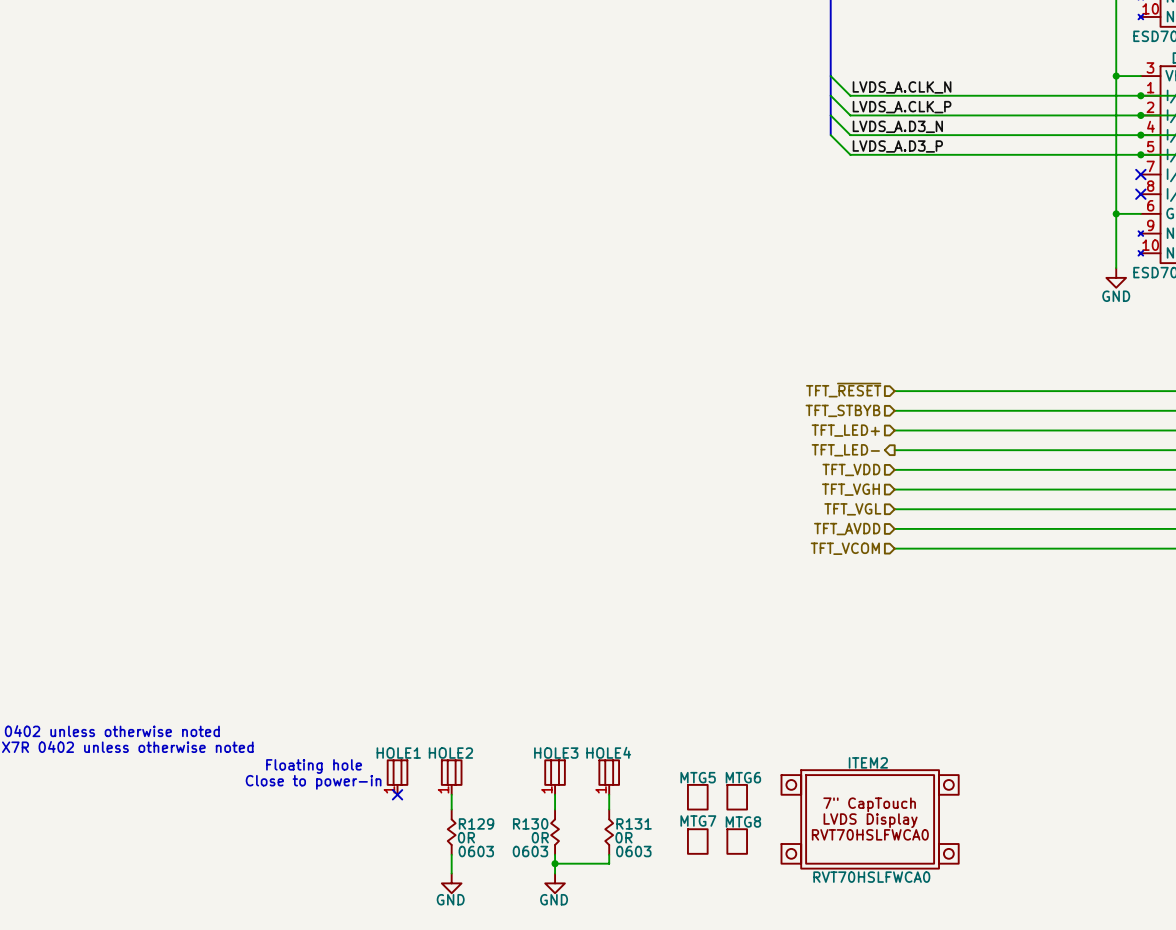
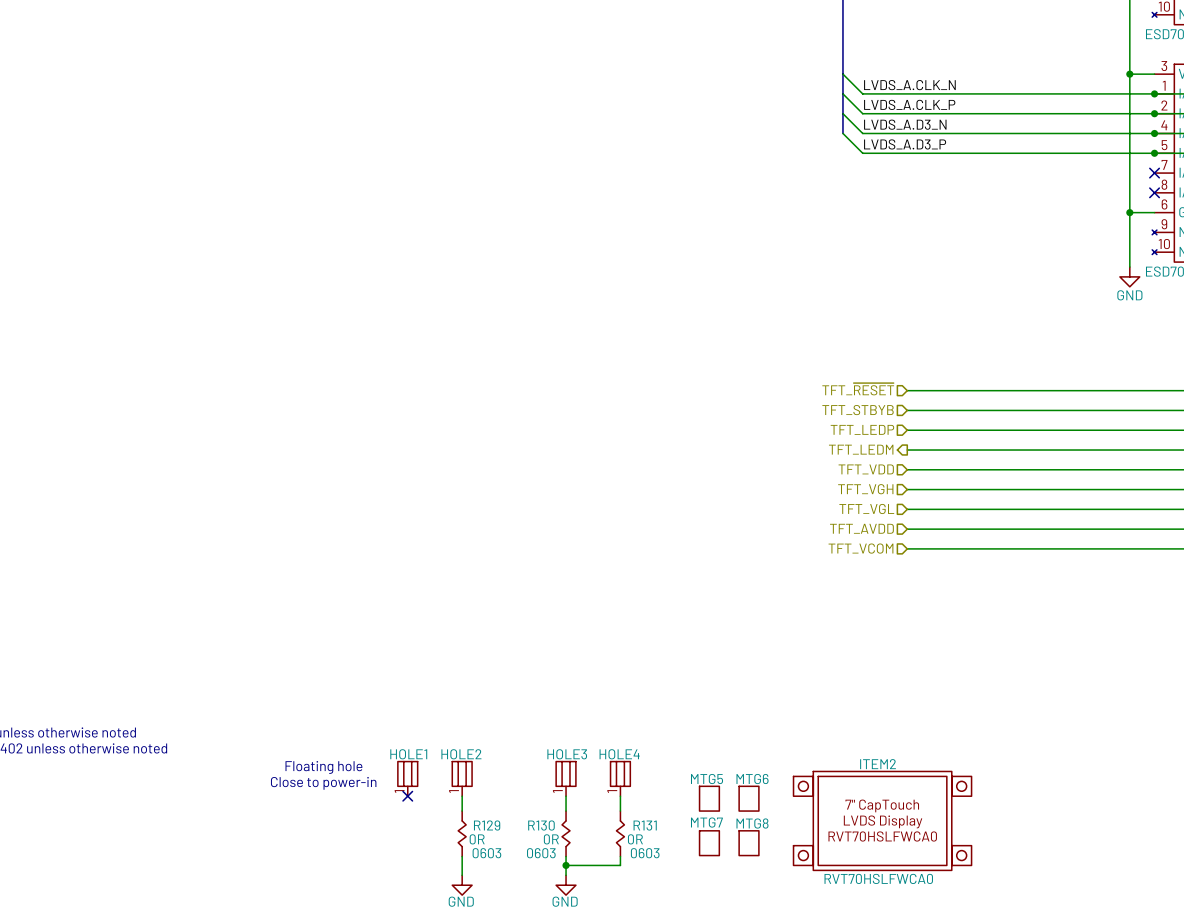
hierarchical label: TFT_LED+ (845, 430) -> TFT_LEDP (862, 429)
hierarchical label: TFT_LED- (845, 450) -> TFT_LEDM (861, 449)

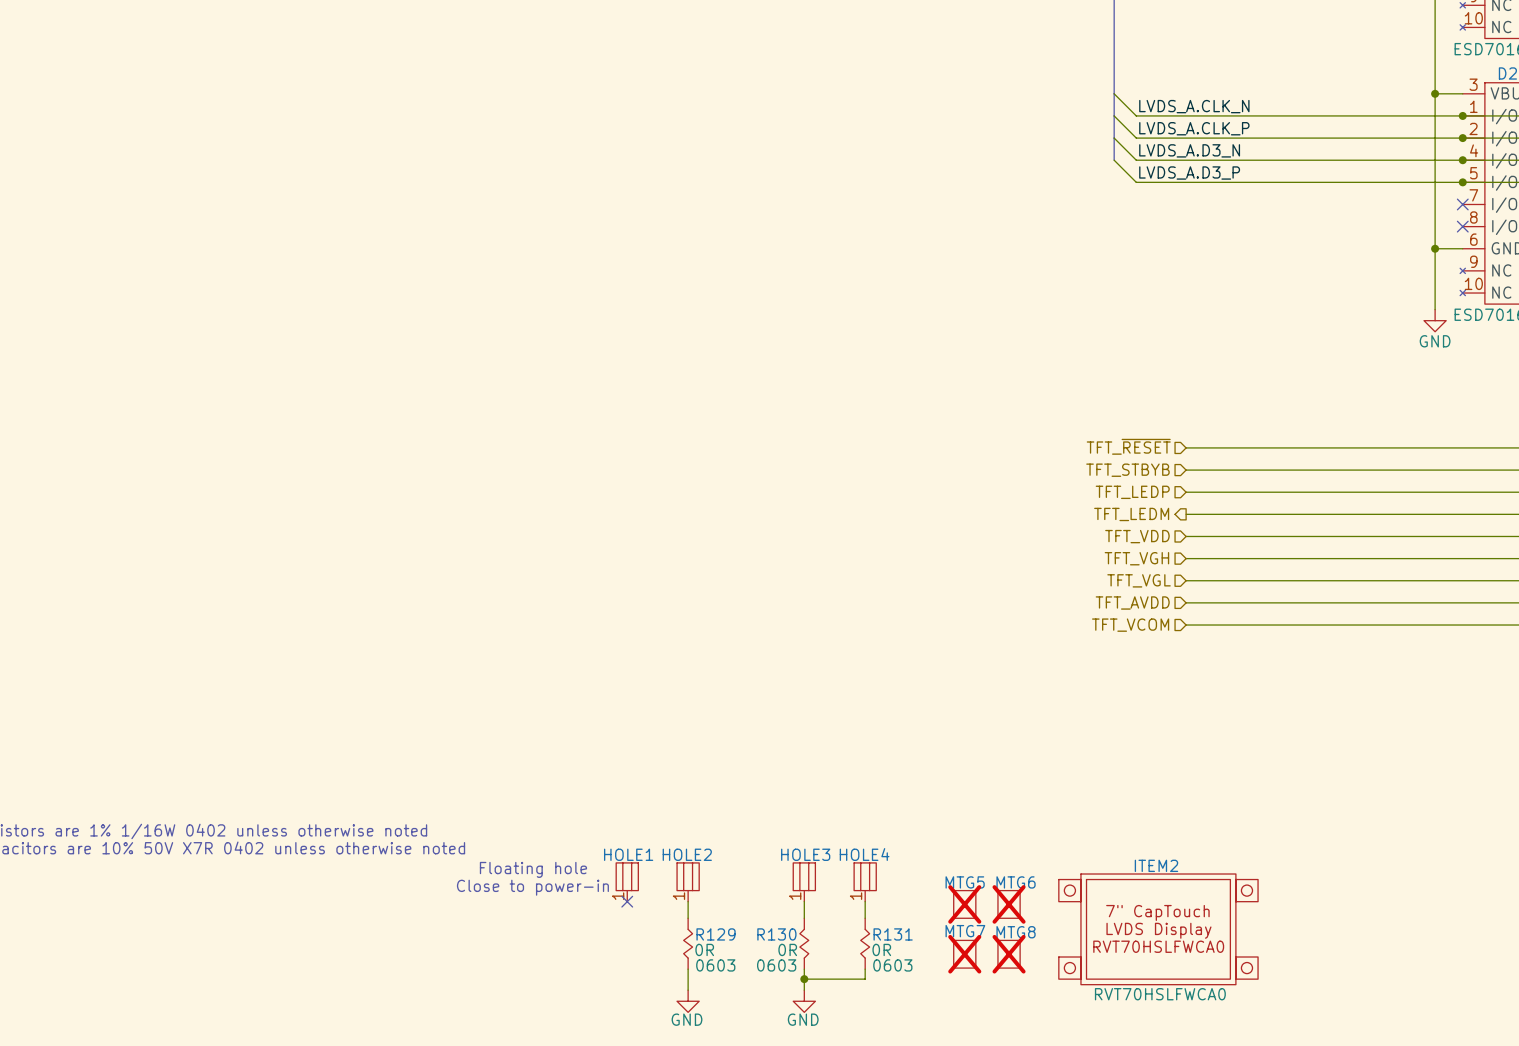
MTG5 do-not-place cross: none -> (964, 904)
MTG6 do-not-place cross: none -> (1009, 904)
MTG7 do-not-place cross: none -> (964, 954)
MTG8 do-not-place cross: none -> (1009, 954)

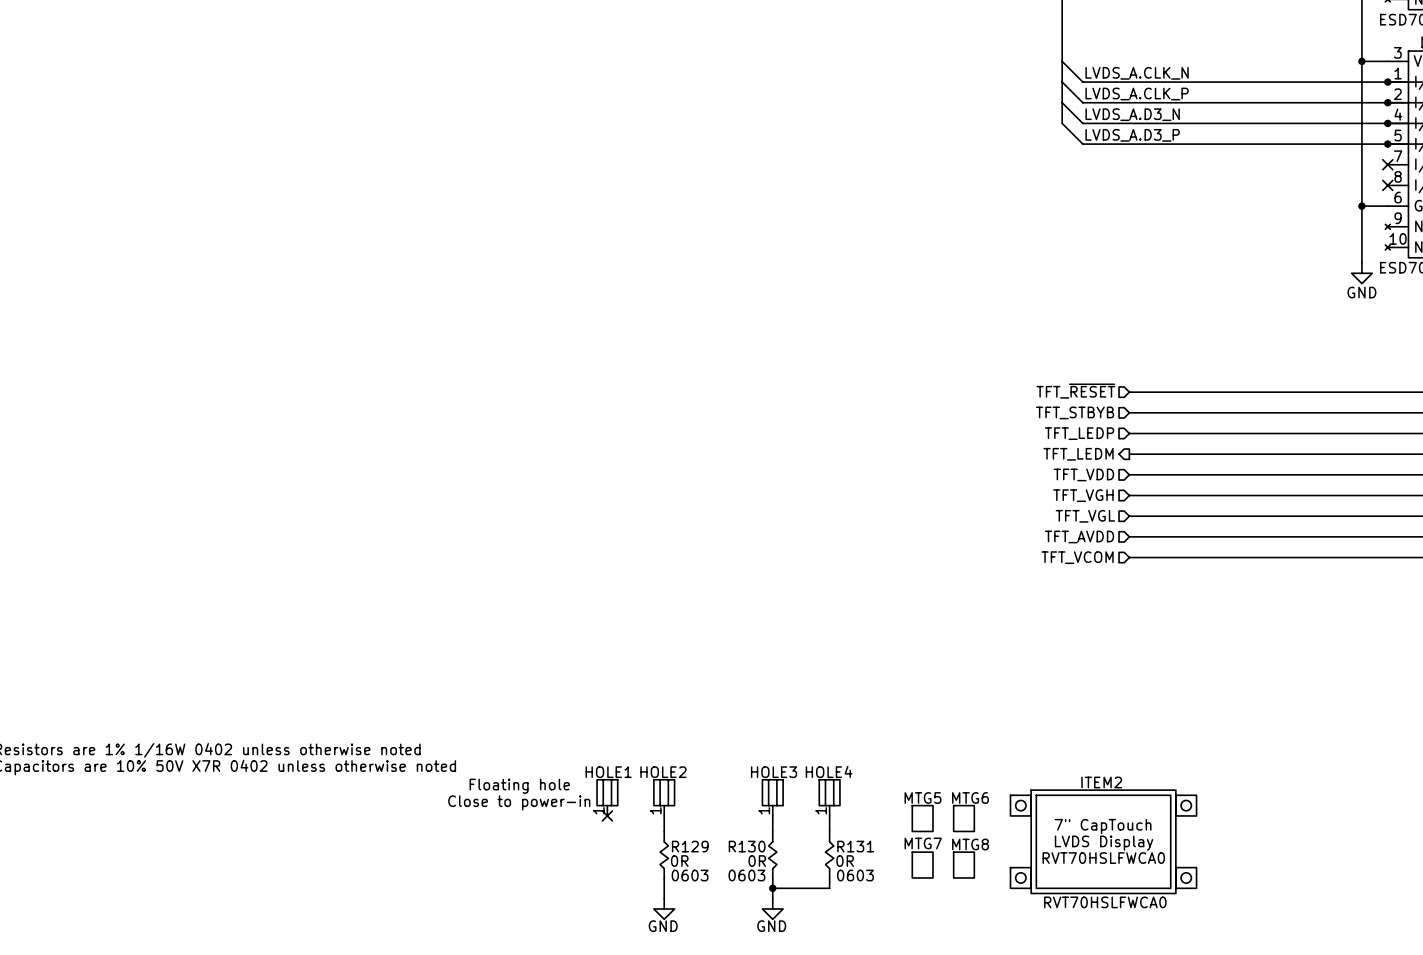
MTG5 do-not-place cross: (964, 904) -> none
MTG6 do-not-place cross: (1009, 904) -> none
MTG7 do-not-place cross: (964, 954) -> none
MTG8 do-not-place cross: (1009, 954) -> none

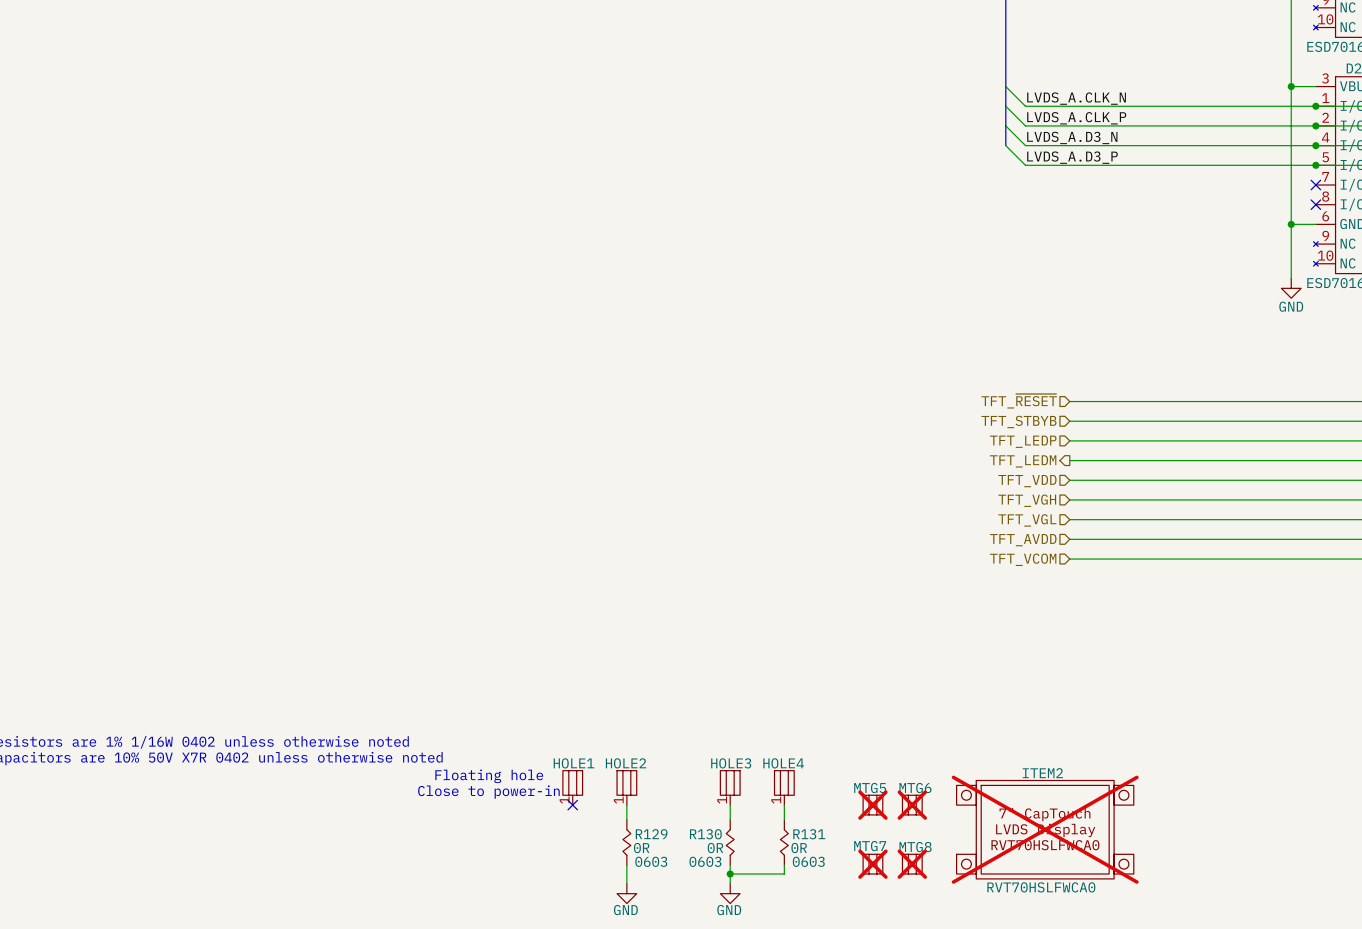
MTG5 symbol: [912, 805, 933, 832] -> [863, 795, 883, 815]
MTG6 symbol: [953, 805, 975, 832] -> [902, 795, 923, 815]
MTG5 do-not-place cross: none -> (872, 805)
MTG6 do-not-place cross: none -> (912, 805)
ITEM2 do-not-place cross: none -> (1045, 829)
MTG7 symbol: [912, 852, 933, 878] -> [863, 854, 883, 874]
MTG8 symbol: [953, 852, 975, 878] -> [902, 854, 923, 874]
MTG7 do-not-place cross: none -> (872, 864)
MTG8 do-not-place cross: none -> (912, 864)

